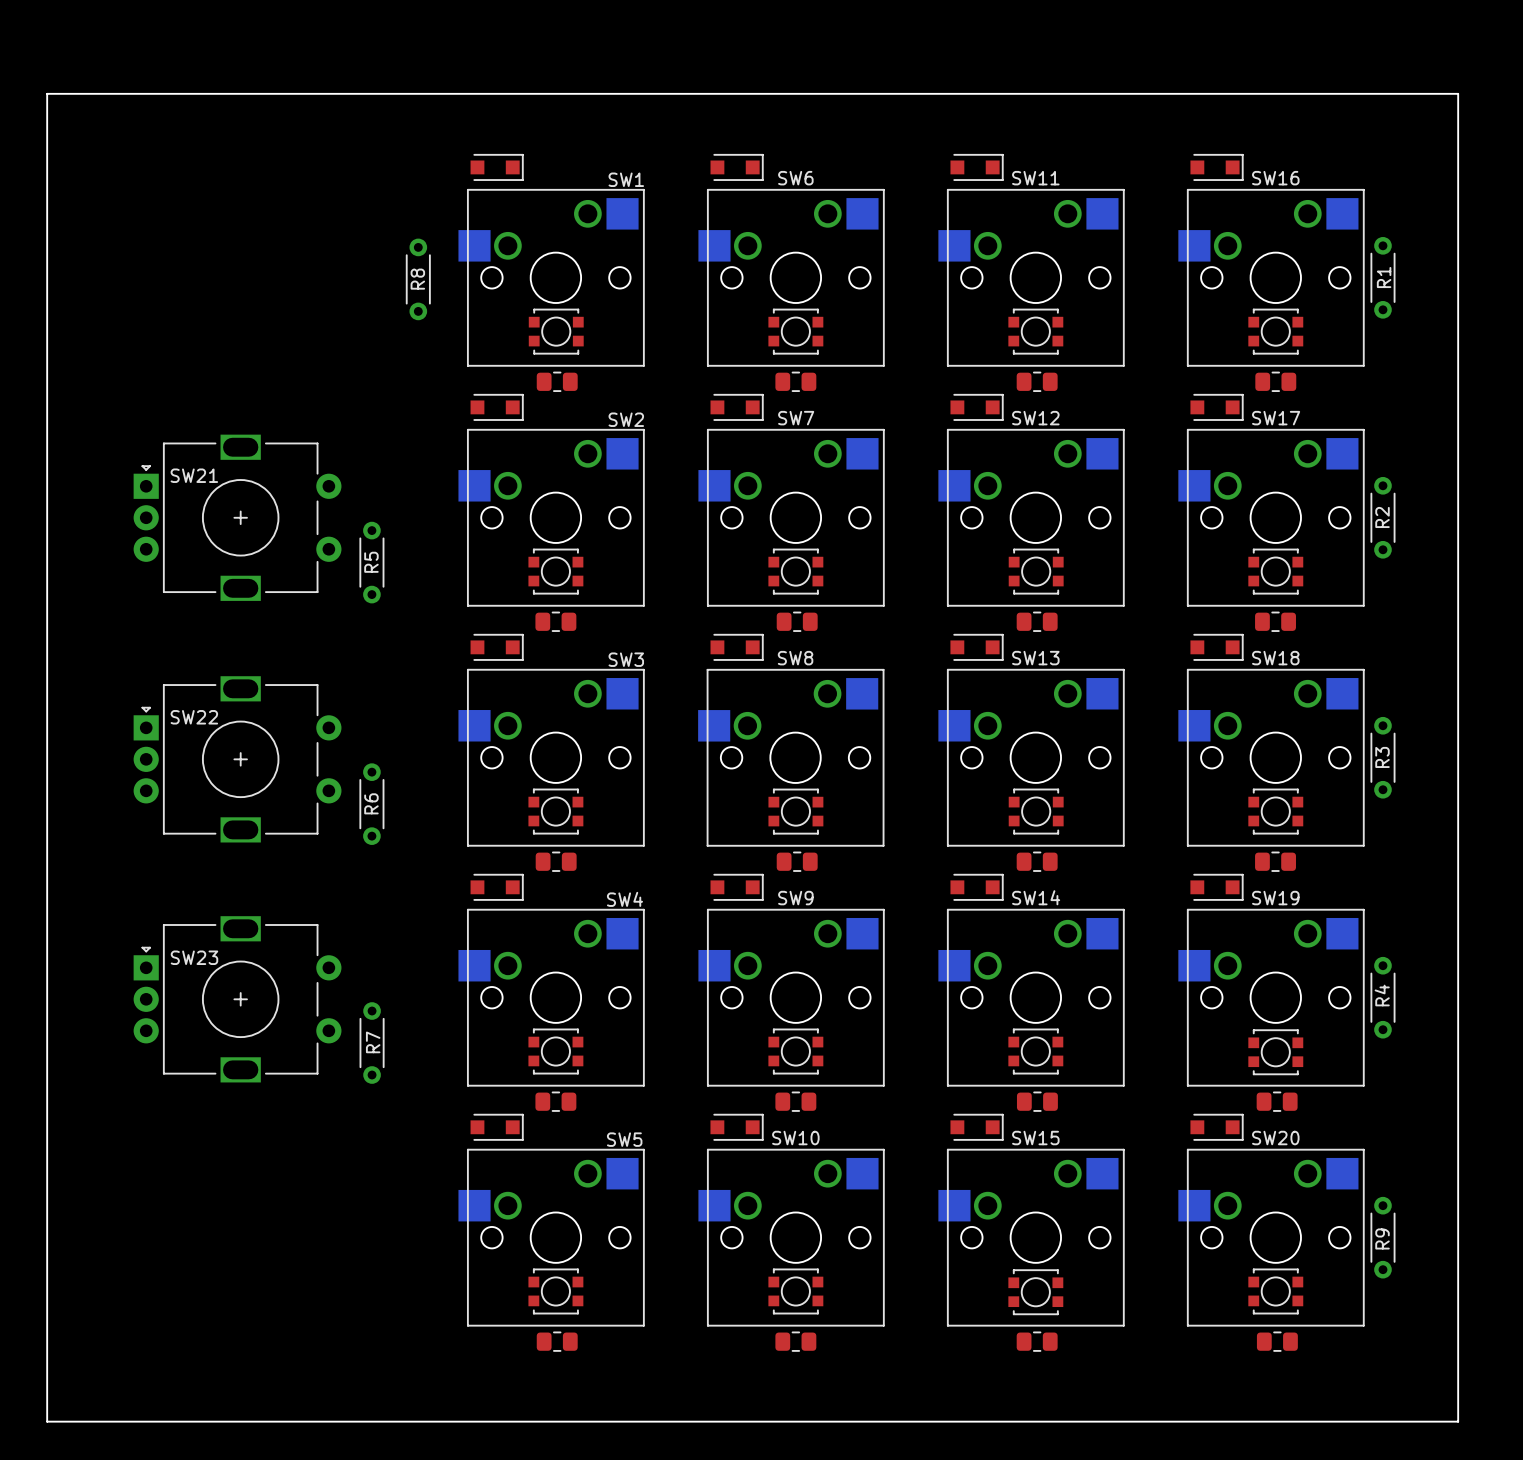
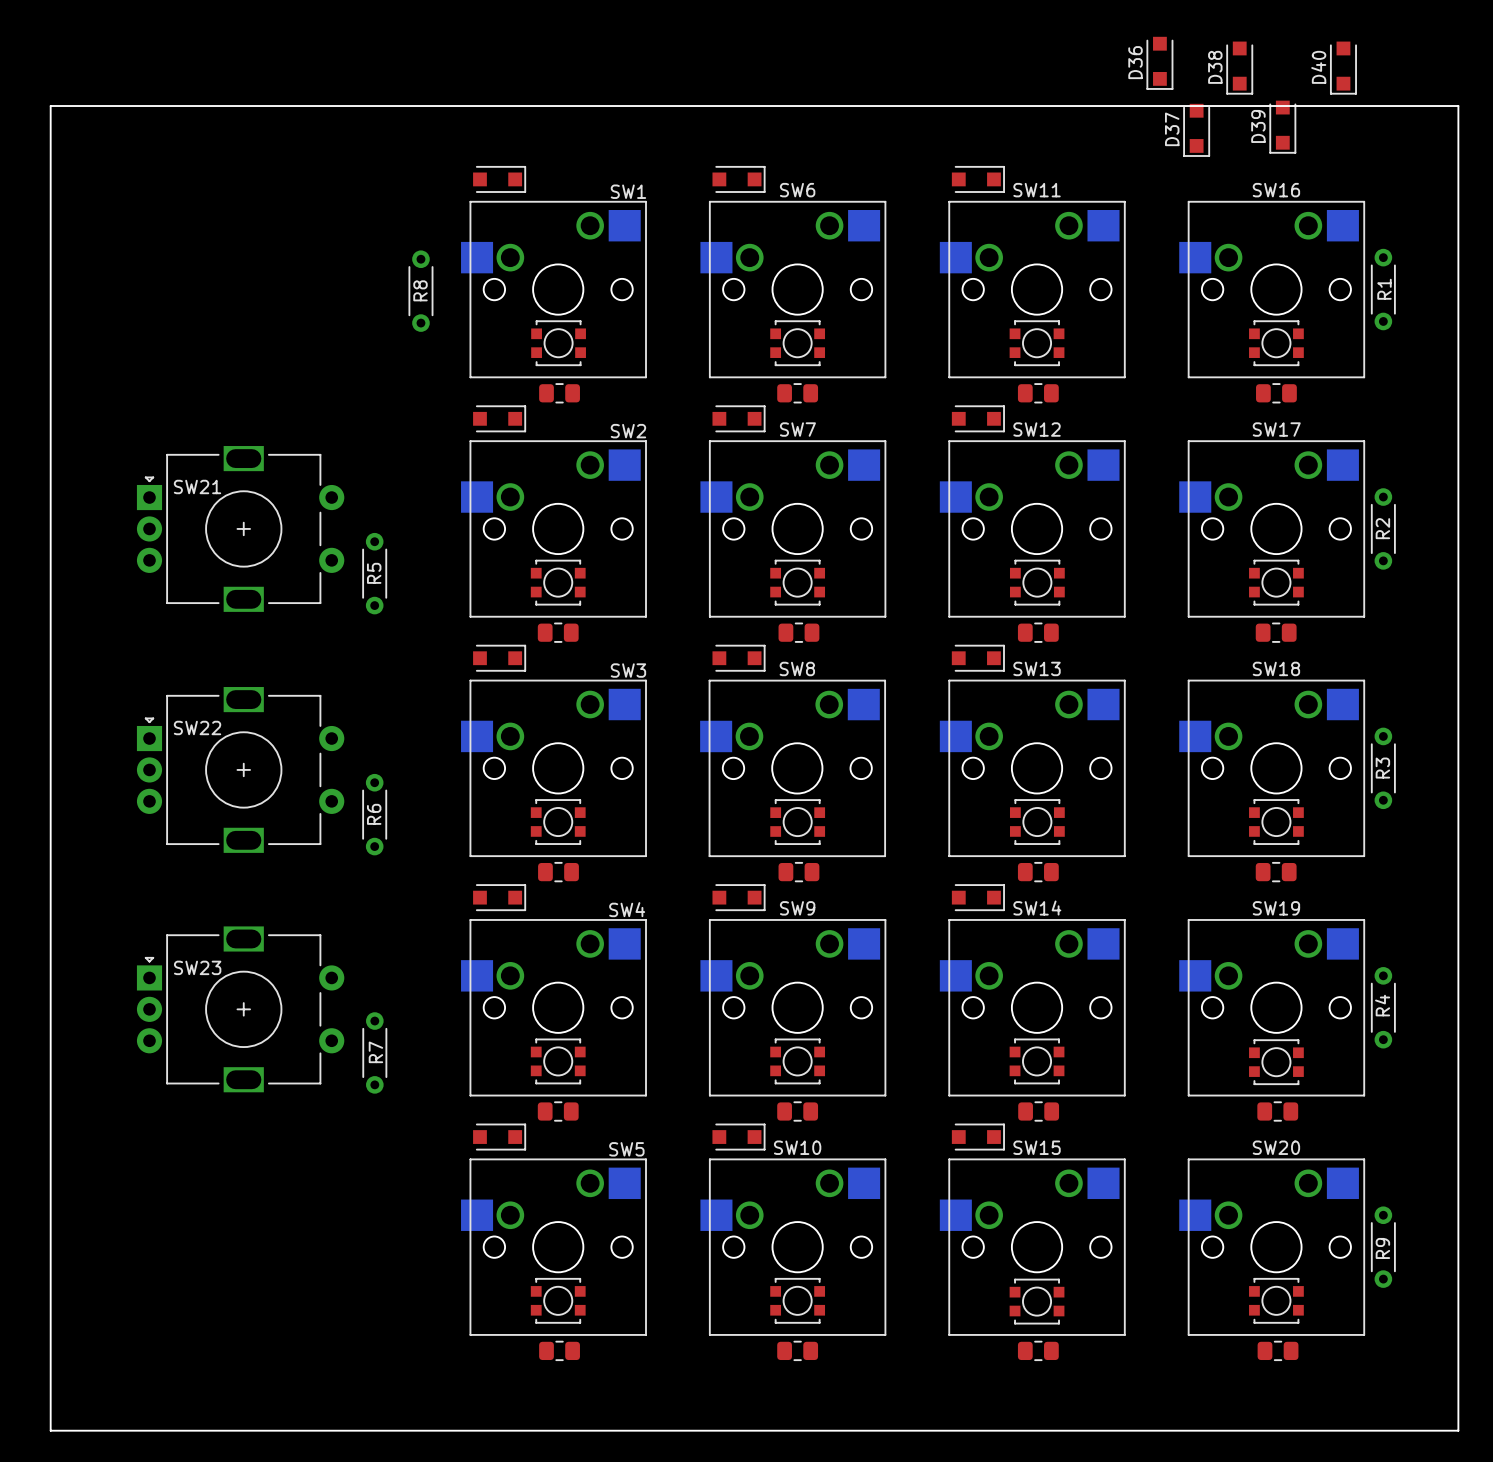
D36: none -> (1159, 63)
D38: none -> (1239, 68)
D40: none -> (1343, 68)
D39: none -> (1282, 127)
D37: none -> (1196, 130)
part: (1216, 167) -> none
part: (1216, 407) -> none
part: (1216, 647) -> none
part: (1216, 887) -> none
part: (1216, 1127) -> none

